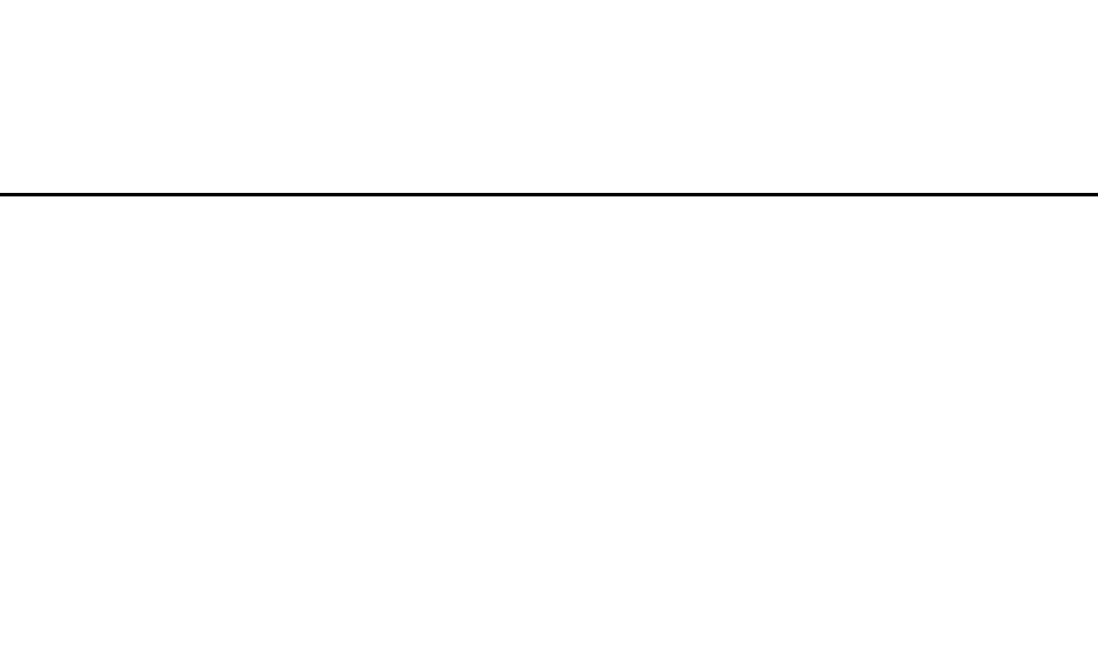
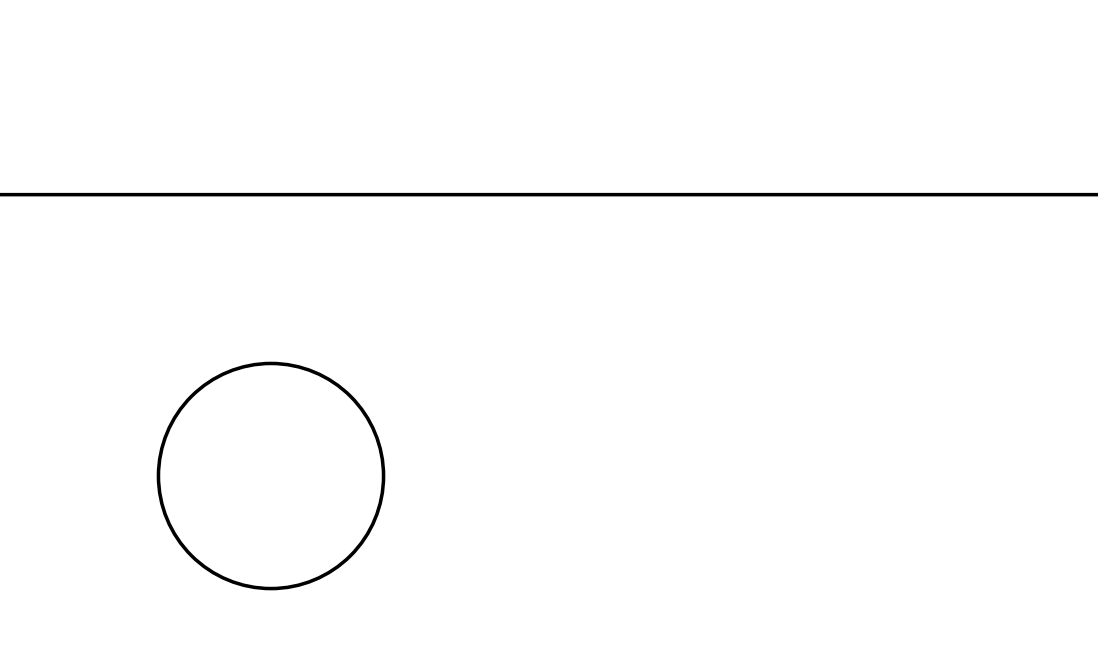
round board edge: none -> [156, 361, 386, 591]

